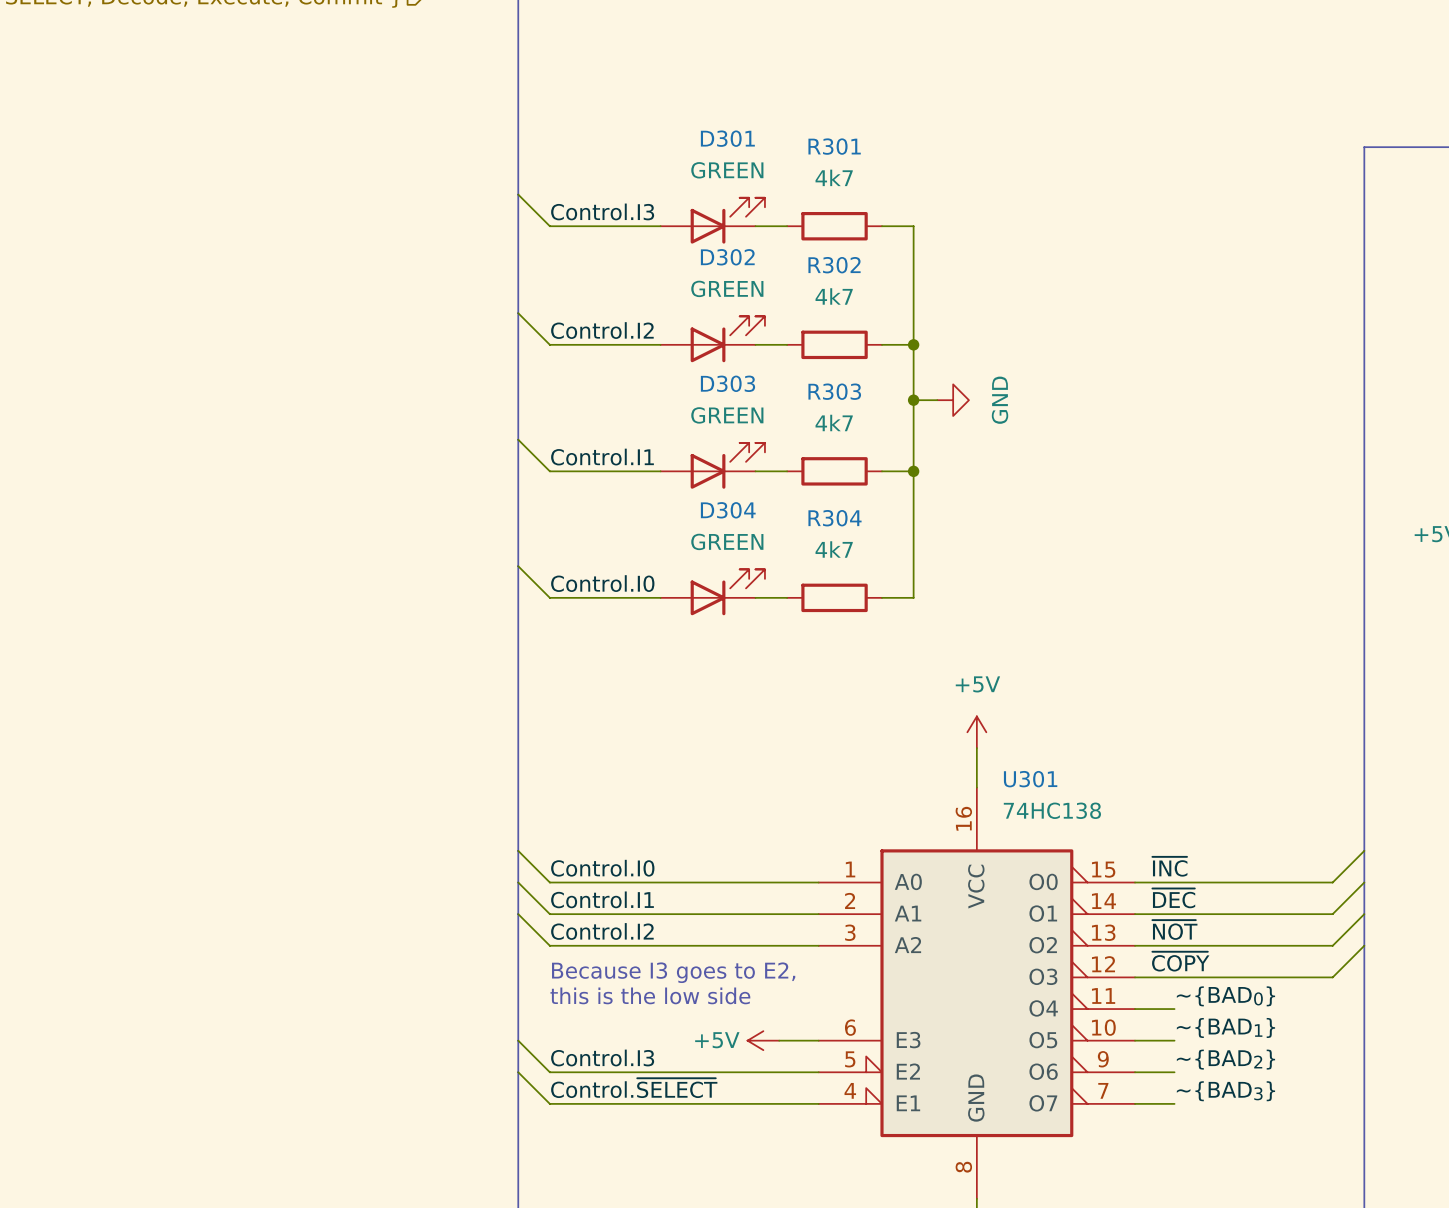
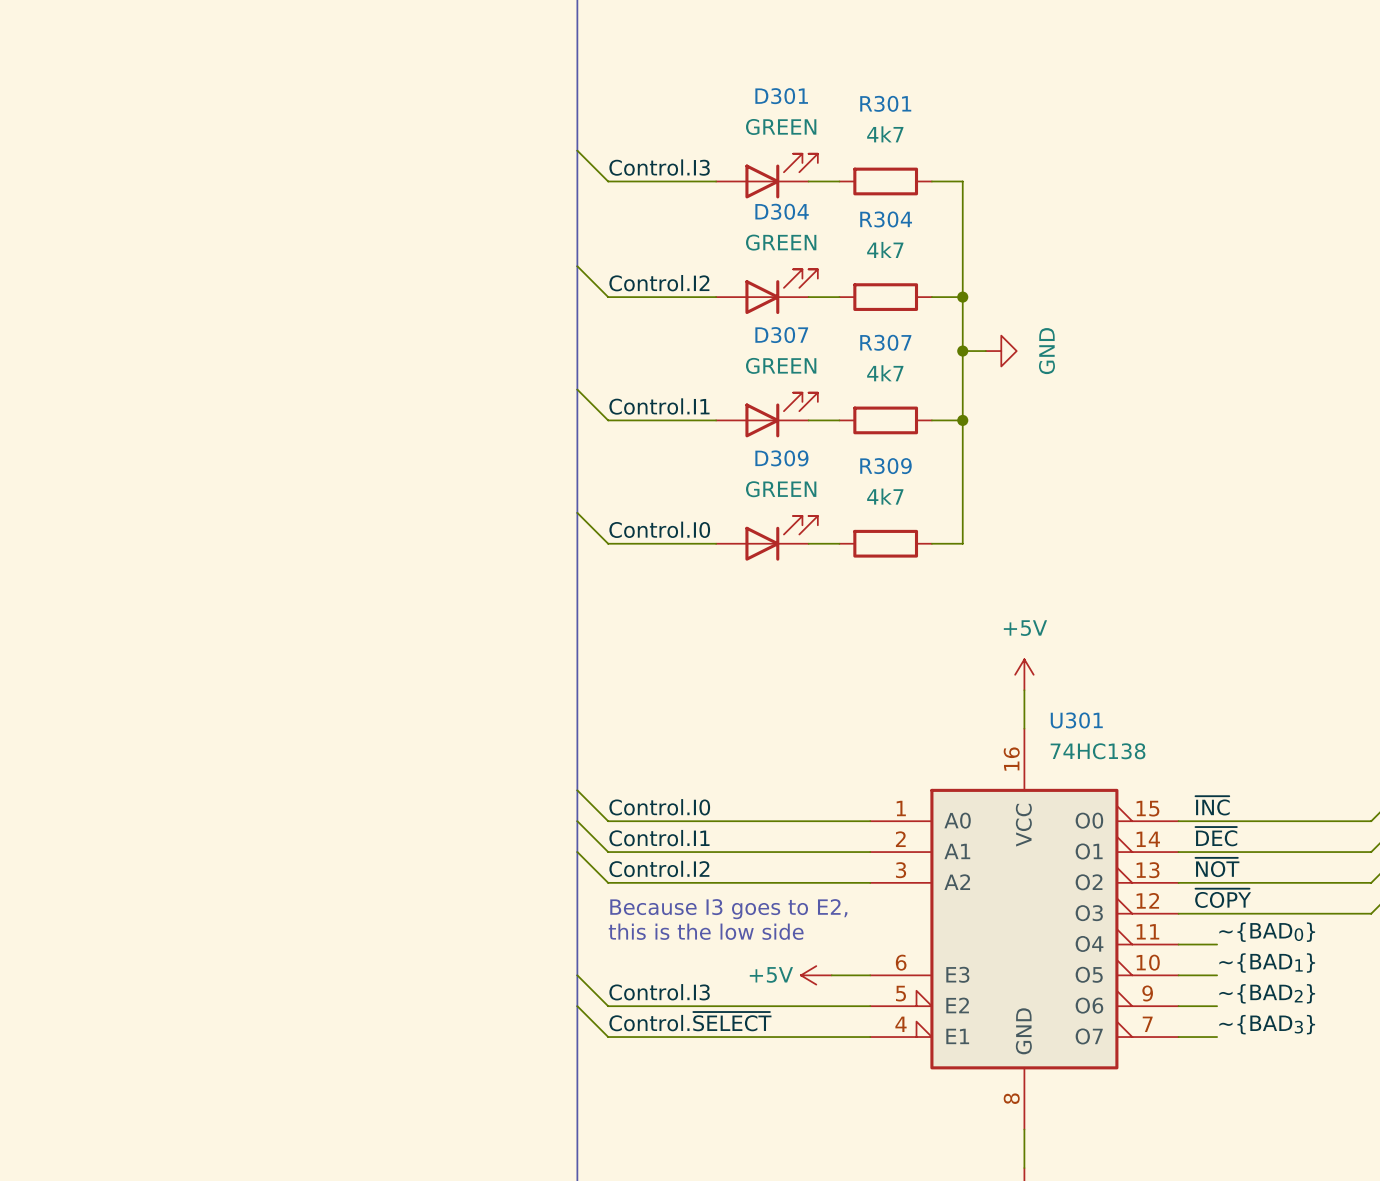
D302 name: D302 (727, 257) -> D304 (782, 211)
R302 name: R302 (834, 265) -> R304 (886, 219)
D303 name: D303 (728, 383) -> D307 (781, 335)
R303 name: R303 (834, 391) -> R307 (885, 342)
D304 name: D304 (728, 510) -> D309 (781, 458)
R304 name: R304 (835, 518) -> R309 (885, 466)

